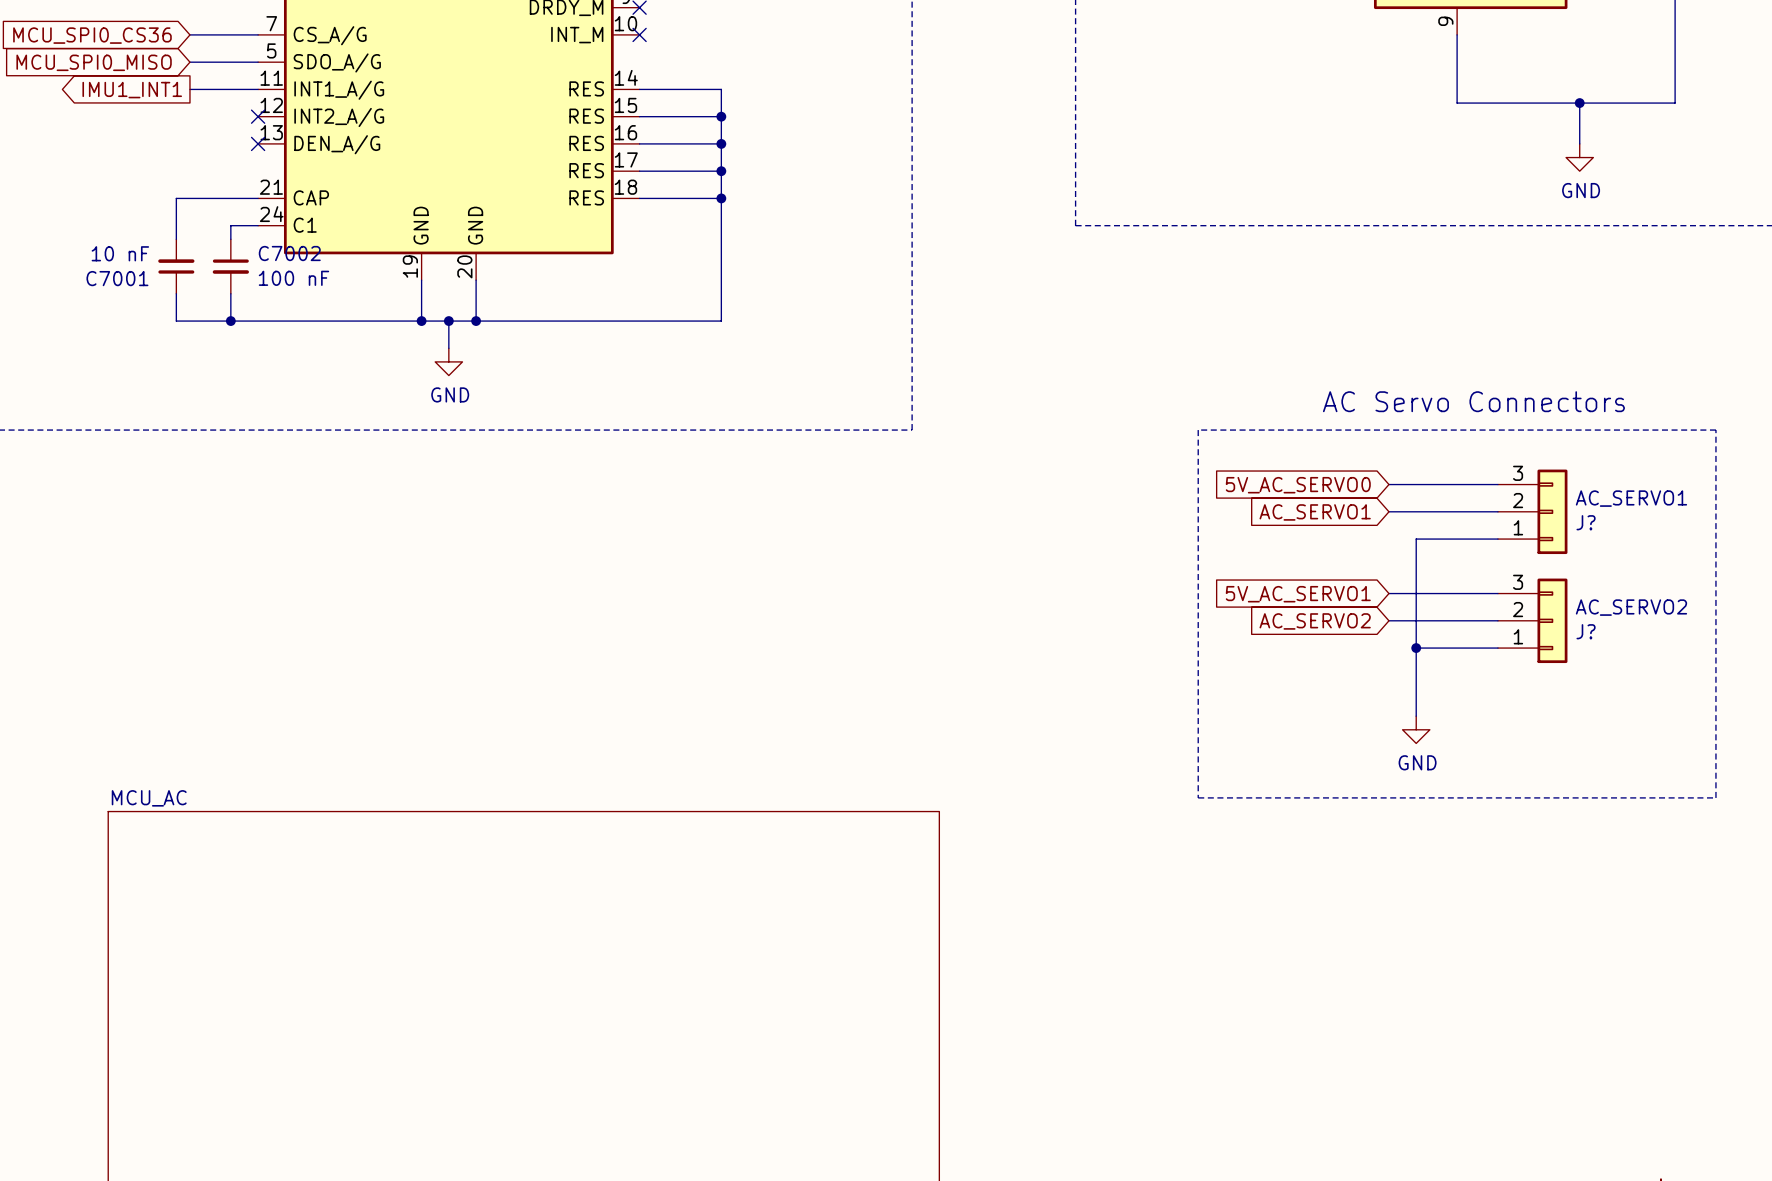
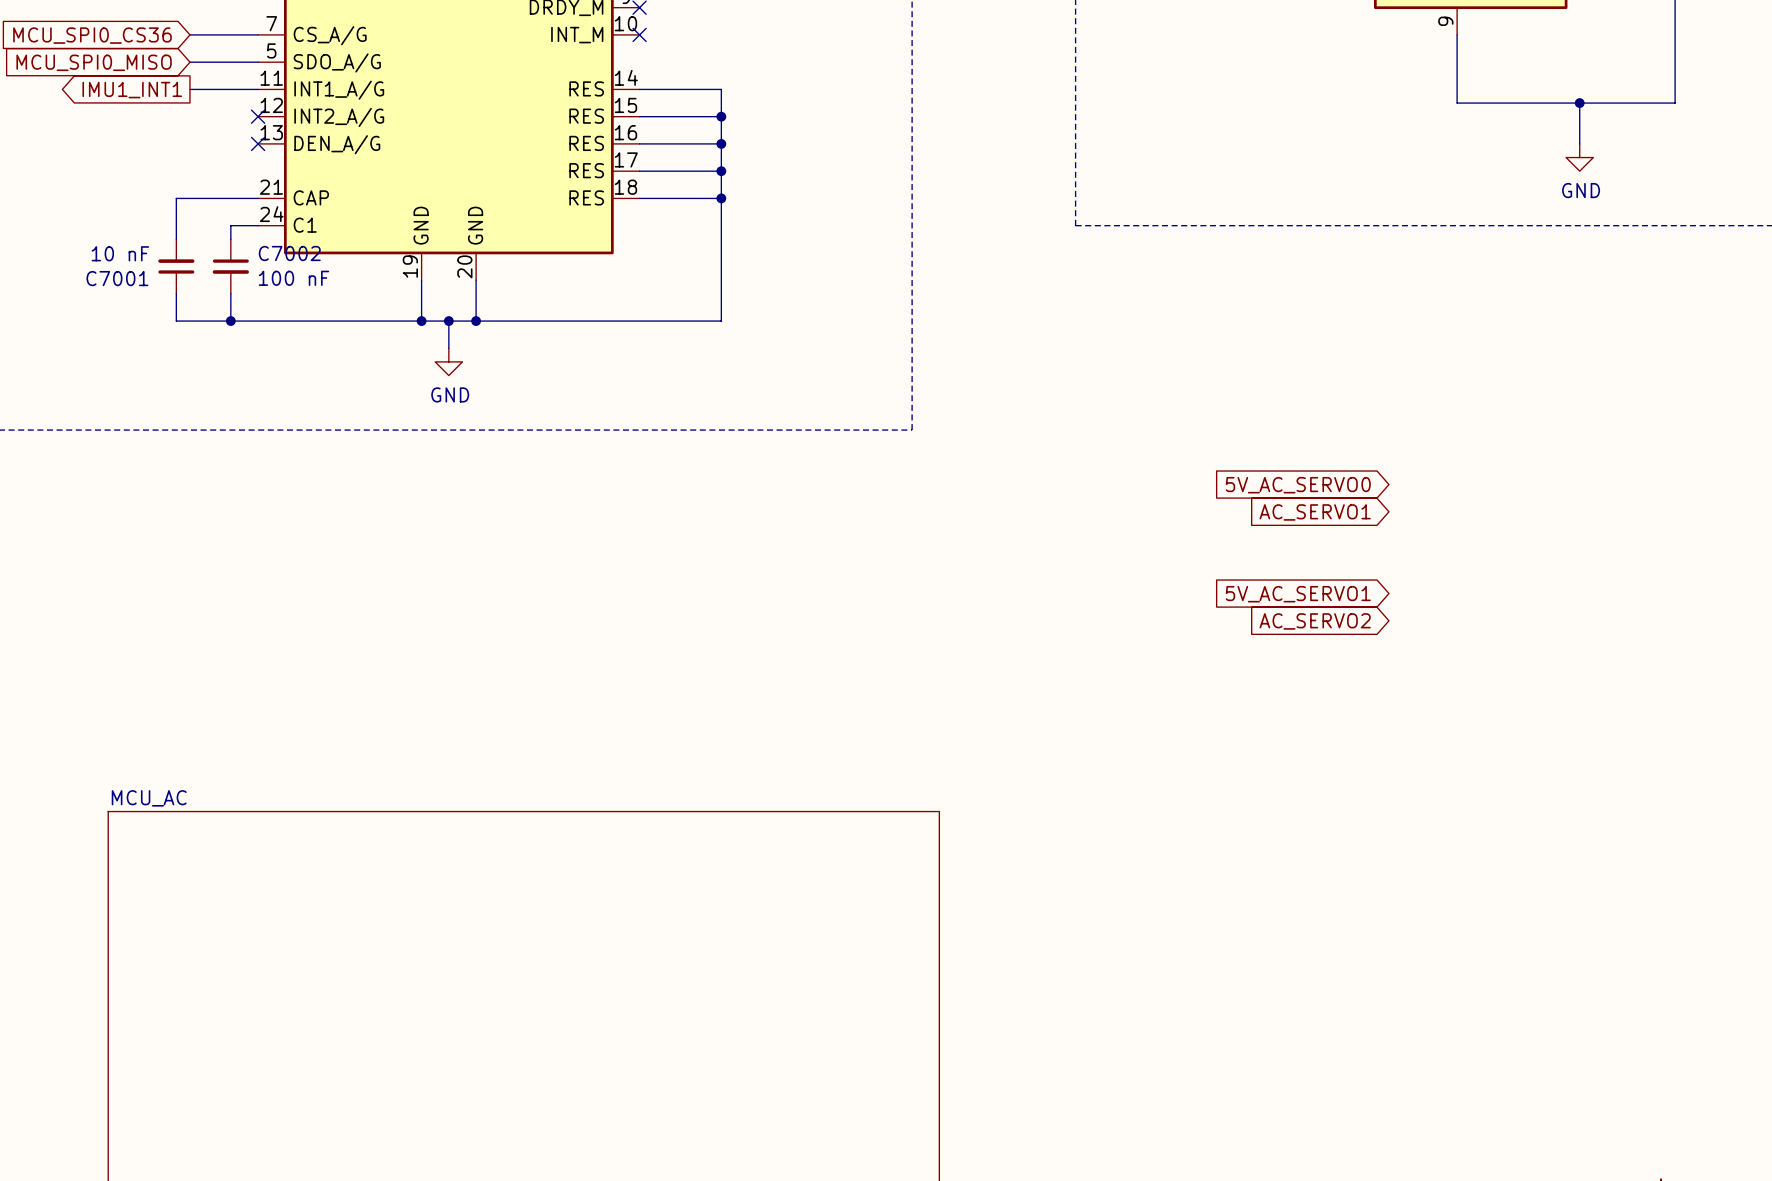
text: AC Servo Connectors (1473, 401) -> none
line: (1198, 430) (1198, 797) (1715, 797) (1715, 430) (1198, 430) -> none
wire: (1388, 484) (1497, 484) -> none
wire: (1388, 511) (1497, 511) -> none
J?: AC_SERVO1 (1532, 511) -> none
wire: (1497, 539) (1416, 539) (1416, 716) -> none
wire: (1388, 593) (1497, 593) -> none
wire: (1388, 620) (1497, 620) -> none
J?: AC_SERVO2 (1532, 620) -> none
wire: (1416, 648) (1497, 648) -> none
junction: (1416, 648) -> none
power symbol: GND (1416, 729) -> none

